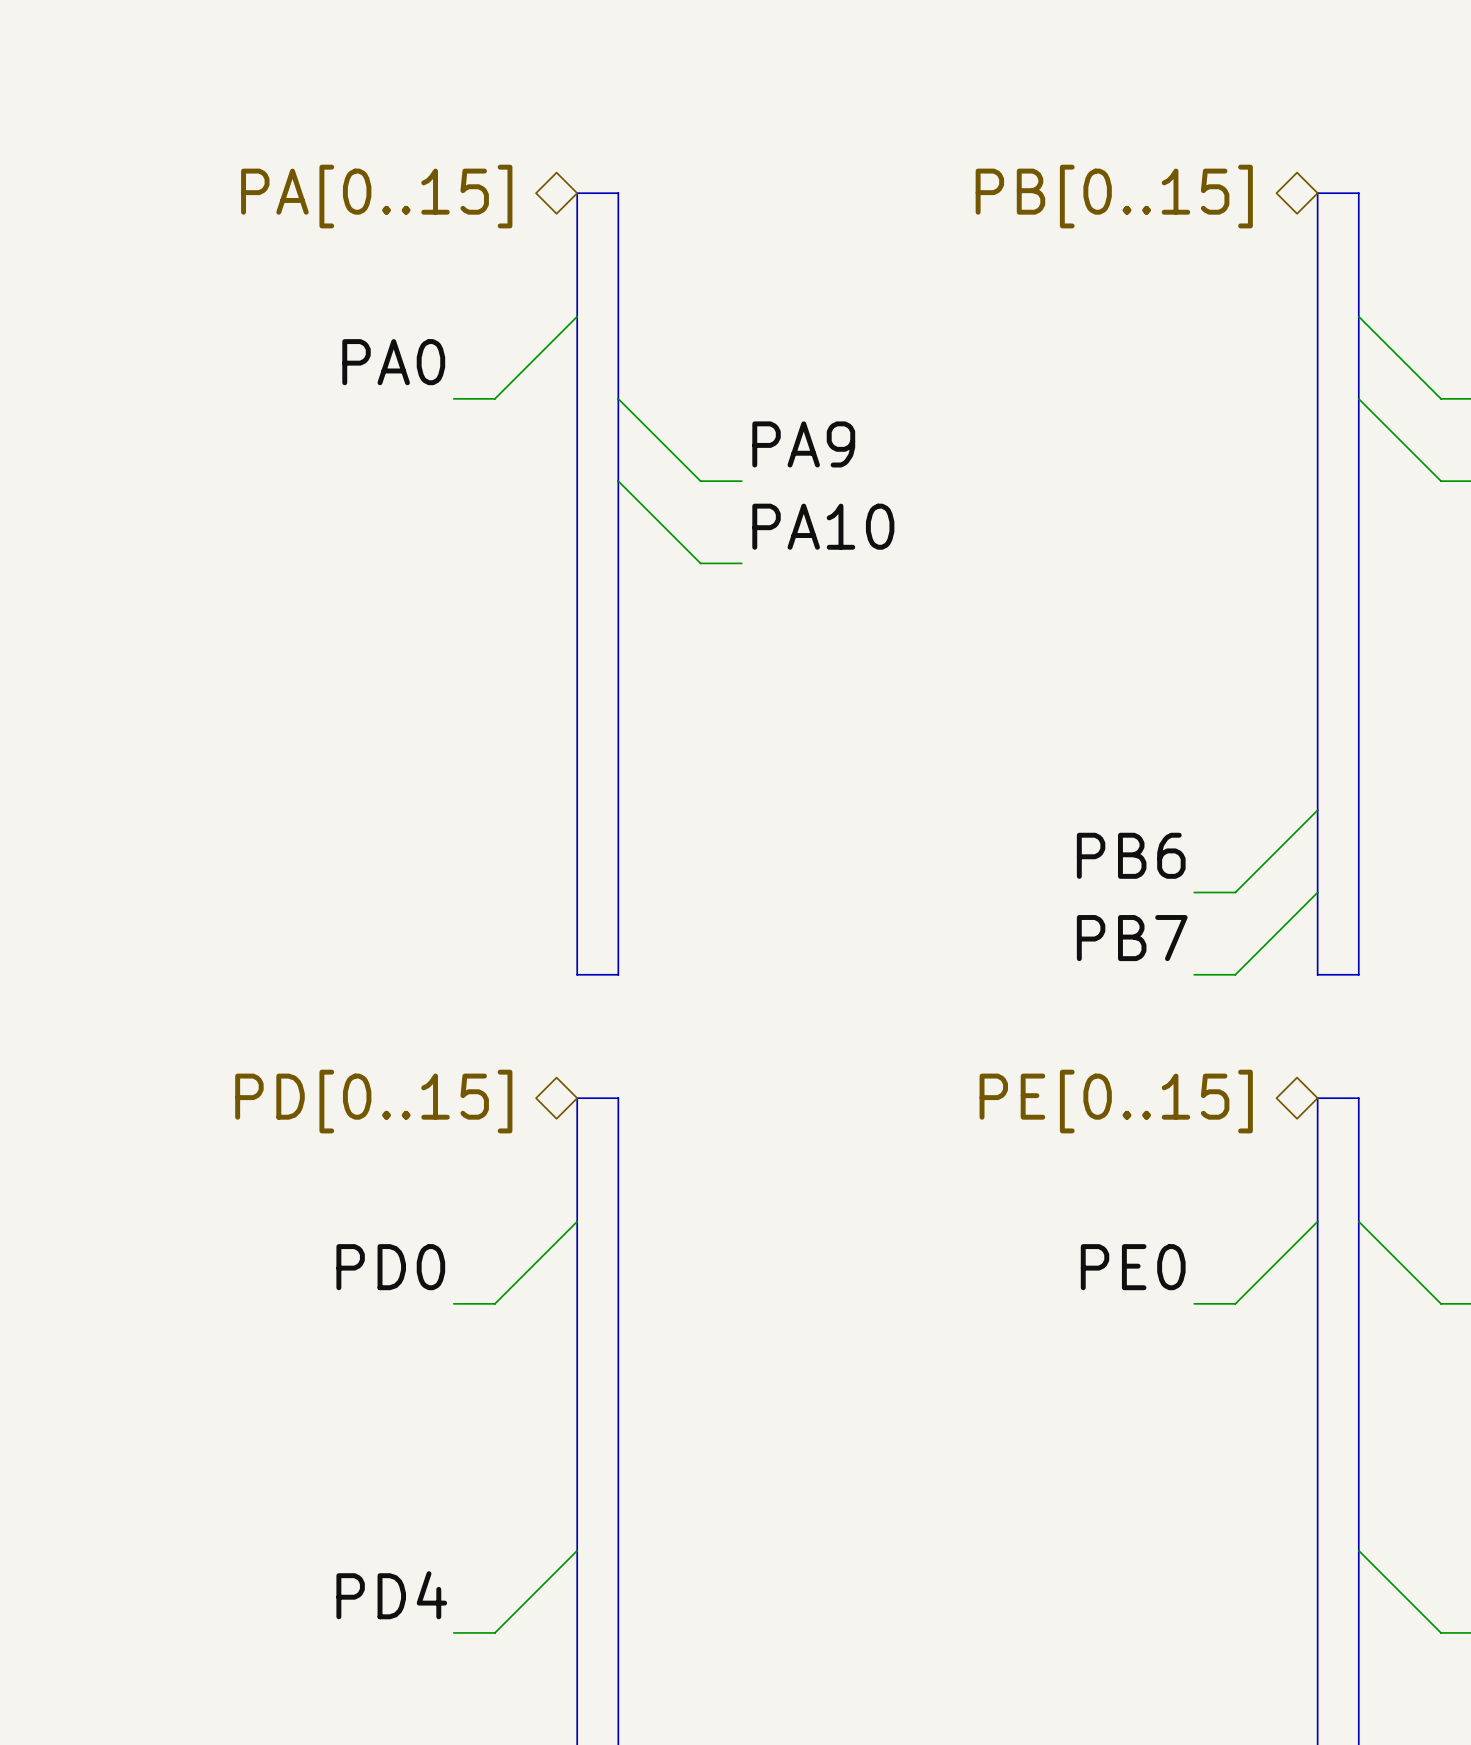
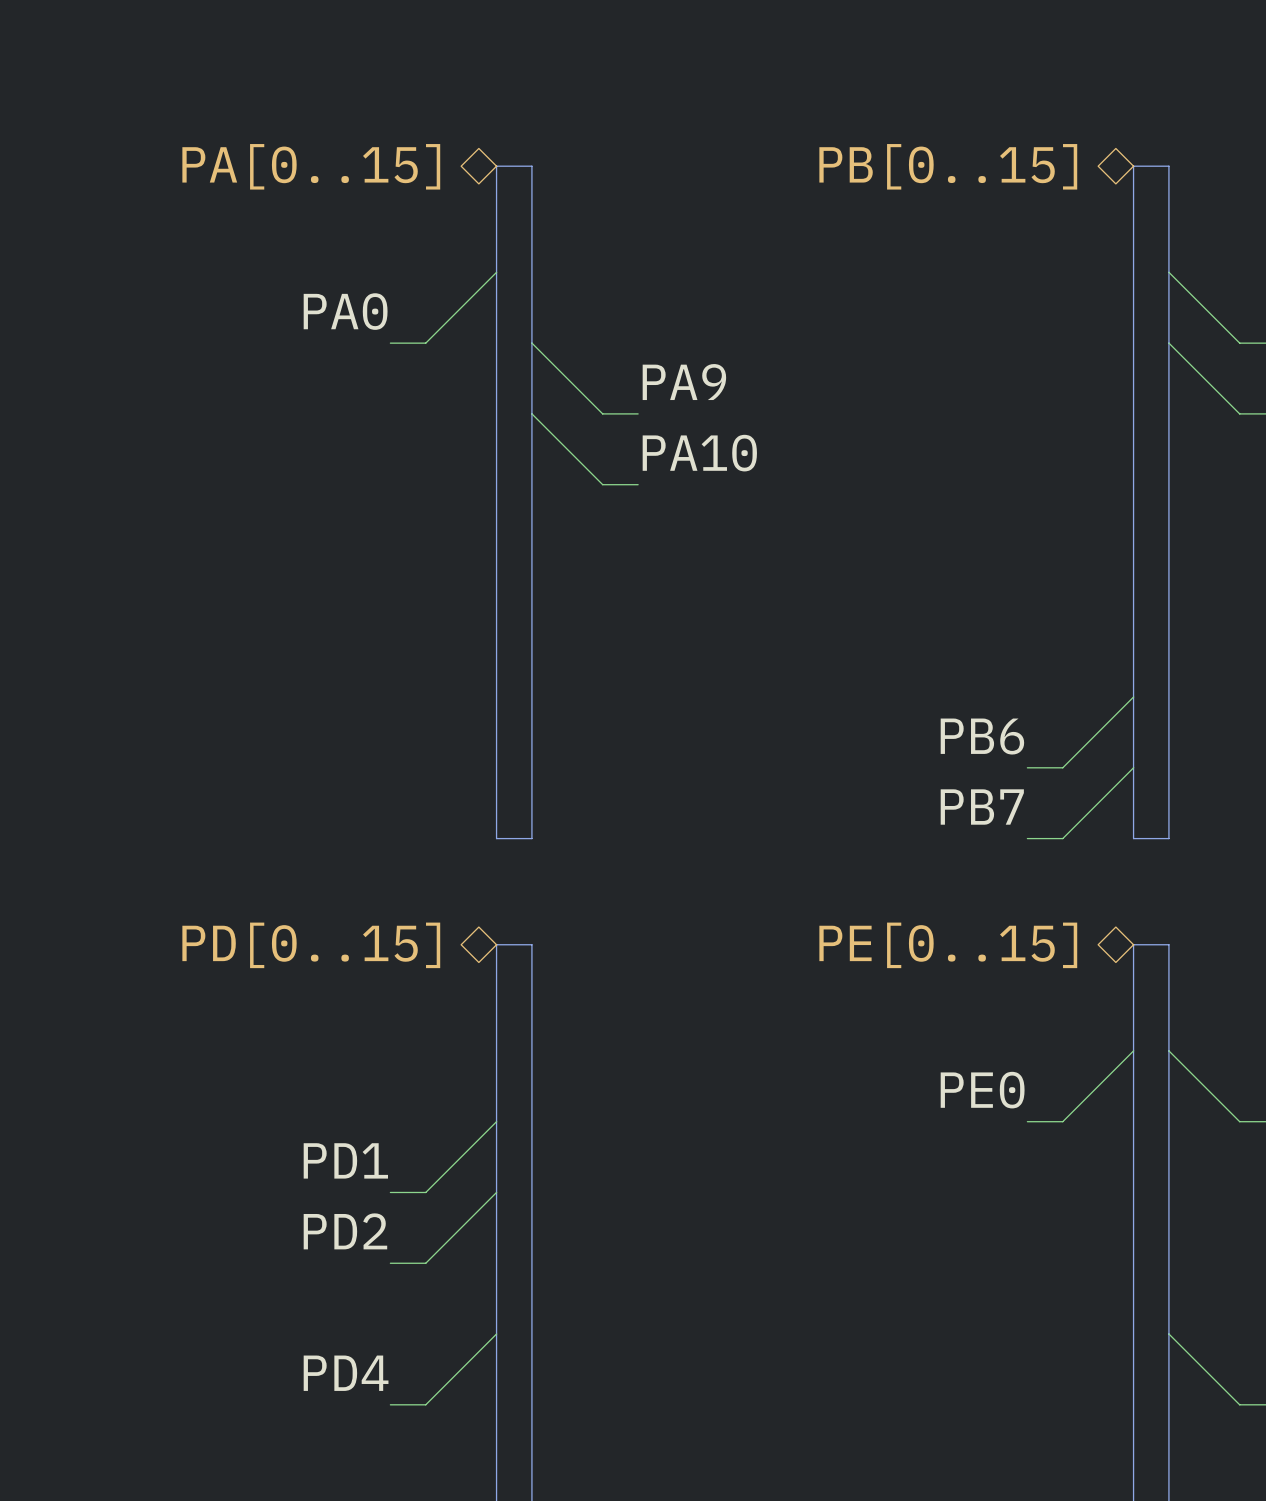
wire: (577, 1221) (494, 1303) (453, 1303) -> (496, 1121) (425, 1192) (390, 1192)
label: PD0 (390, 1267) -> PD1 (345, 1160)
wire: none -> (496, 1192) (425, 1263) (390, 1263)
label: none -> PD2 (345, 1231)

